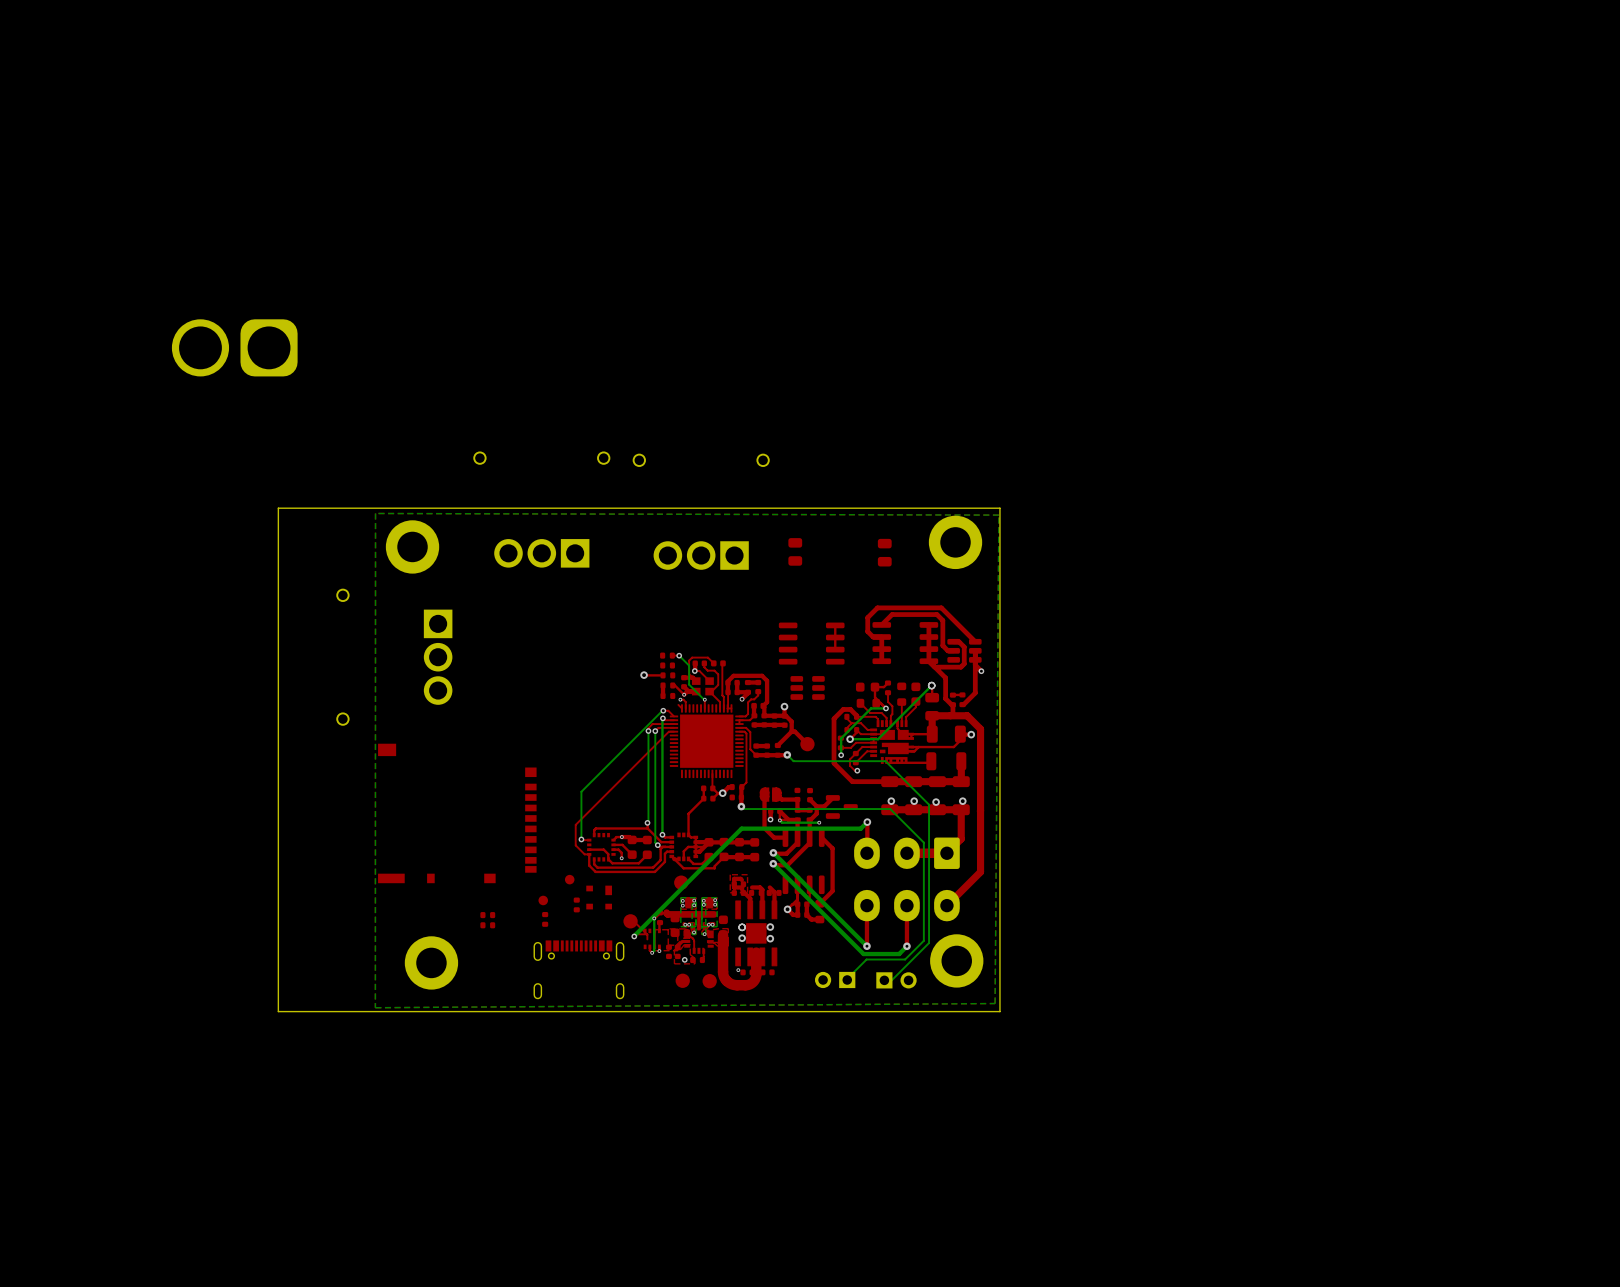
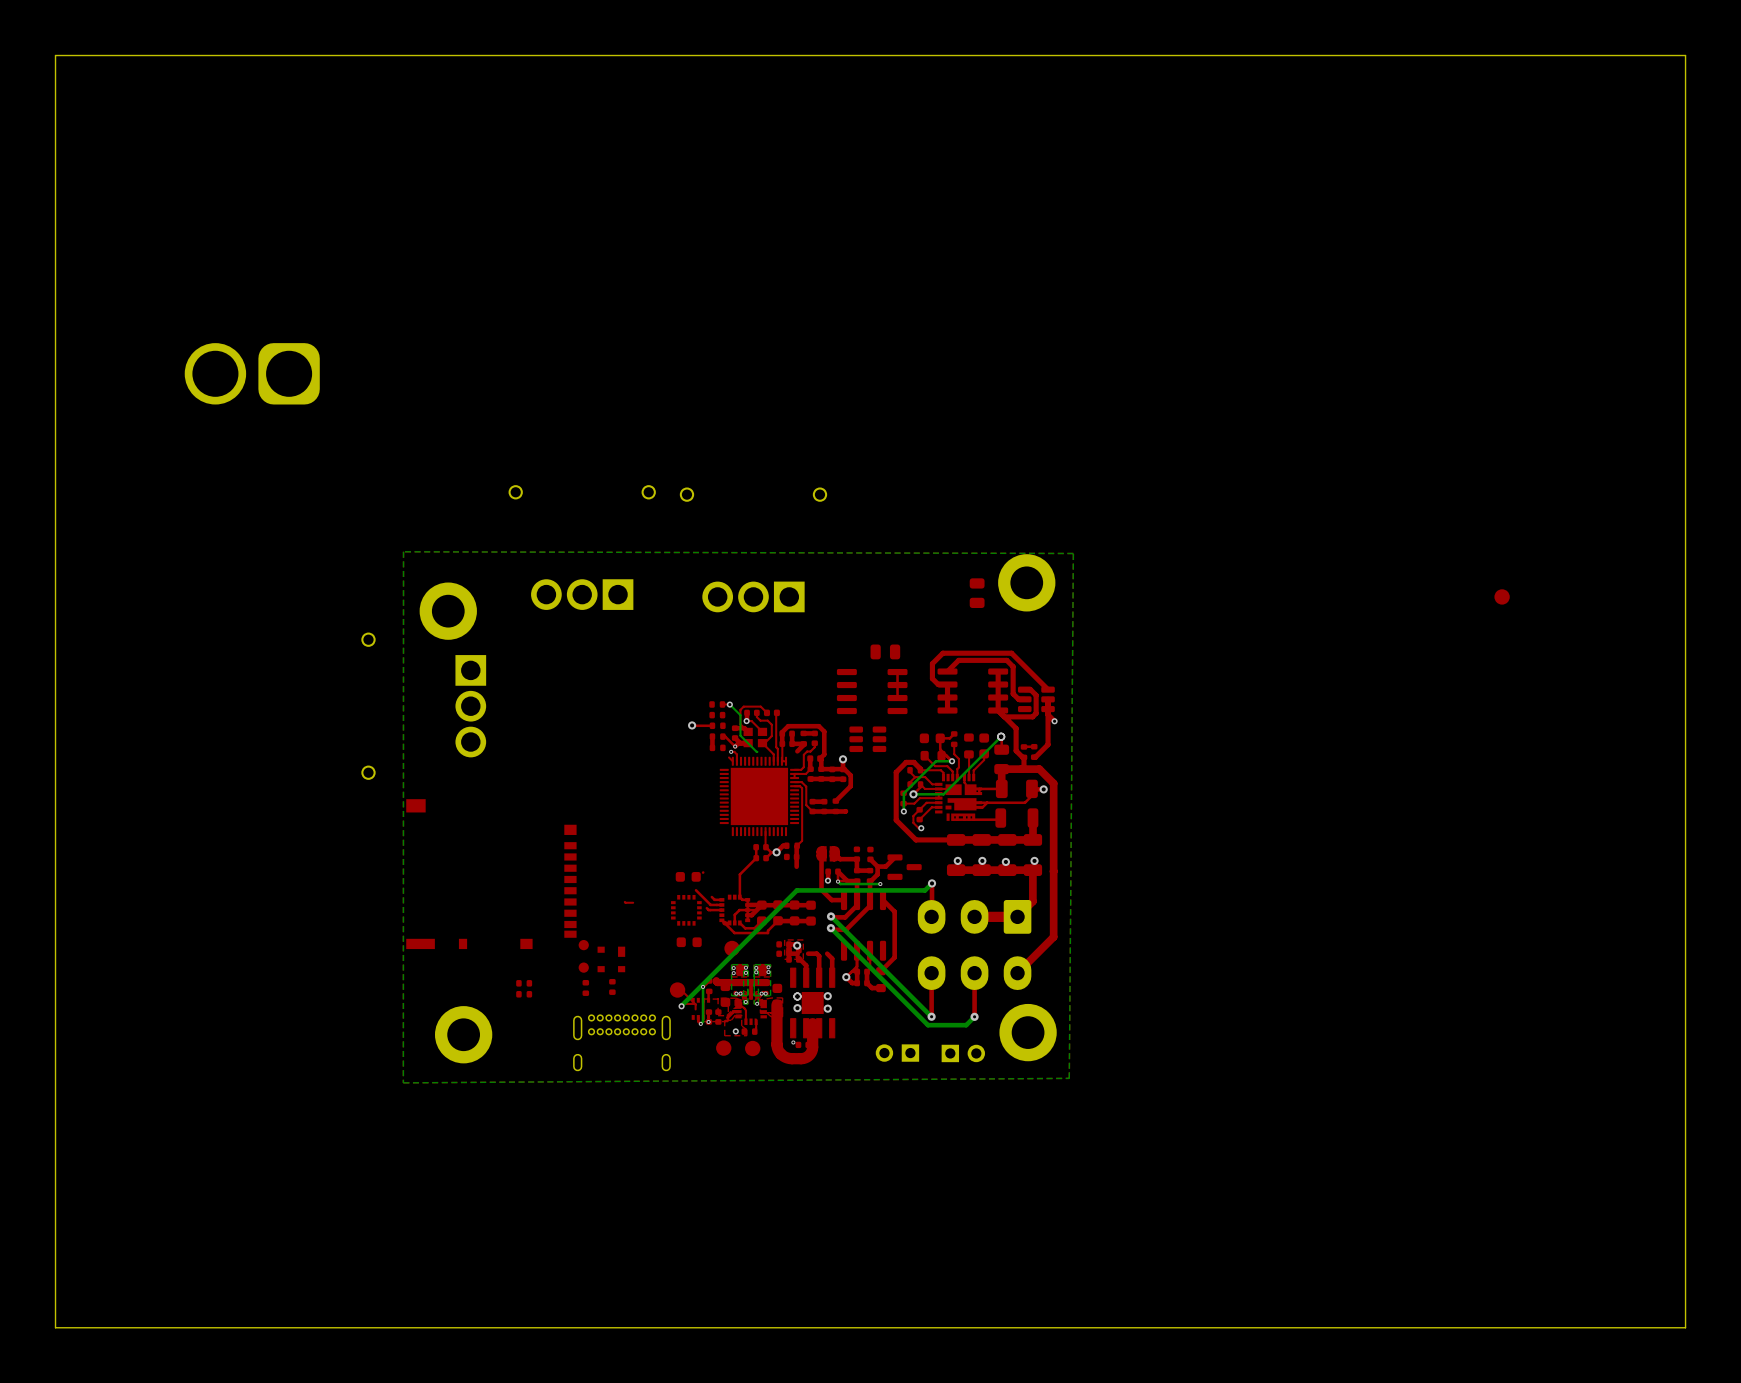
board edge: none -> (1685, 55) (1685, 1327) (55, 1327) (55, 55) (1685, 55)
board edge: (999, 508) (999, 1011) (278, 1011) (278, 508) (999, 508) -> none
part position: (412, 546) -> (448, 611)
part: (795, 551) -> none
part position: (884, 552) -> (977, 593)
part: none -> (1502, 596)
part: none -> (885, 651)
top track: (704, 699) (704, 708) -> none
via: (704, 699) -> none
via: (742, 699) -> none
top track: (663, 710) (668, 710) (673, 716) -> none
bottom track: (663, 710) (581, 791) (581, 839) -> none
via: (663, 710) -> none
top track: (662, 718) (664, 720) (673, 720) -> none
bottom track: (662, 718) (662, 834) -> none
via: (662, 718) -> none
top track: (673, 724) (652, 724) (648, 731) -> none
top track: (673, 727) (658, 727) (655, 731) -> none
bottom track: (648, 731) (647, 822) -> none
via: (648, 731) -> none
bottom track: (655, 731) (655, 842) (657, 845) -> none
via: (655, 731) -> none
top track: (673, 731) (668, 731) (575, 824) (575, 845) (584, 854) (589, 854) (589, 865) (595, 871) (654, 871) (664, 861) (664, 853) (671, 851) -> none
top track: (791, 731) (794, 731) (807, 744) -> none
part: (807, 744) -> none
bottom track: (787, 754) (793, 761) (885, 761) (929, 804) (929, 943) (891, 980) (884, 980) -> none
via: (787, 754) -> none
bottom track: (741, 806) (743, 809) (890, 809) (923, 842) (923, 940) (905, 959) (866, 959) (847, 979) -> none
via: (741, 806) -> none
top track: none -> (703, 872) (703, 872)
part: none -> (688, 876)
top track: (647, 822) (647, 828) (595, 828) (594, 835) -> none
via: (647, 822) -> none
via: (662, 834) -> none
via: (621, 837) -> none
via: (581, 839) -> none
top track: (647, 840) (616, 837) (613, 840) -> none
top track: (613, 844) (622, 844) (632, 854) -> none
via: (657, 845) -> none
top track: (662, 846) (660, 849) (660, 860) (653, 867) (597, 867) (594, 864) (594, 859) -> none
part position: (601, 847) -> (686, 910)
part: (632, 847) -> none
part: (647, 847) -> none
top track: (589, 849) (603, 849) (608, 854) (608, 859) -> none
top track: (613, 849) (618, 849) (621, 852) (621, 858) -> none
top track: (647, 854) (638, 863) (612, 863) (608, 859) -> none
via: (621, 858) -> none
part: none -> (689, 942)
part: none -> (784, 944)
part position: (569, 879) -> (583, 945)
via: none -> (797, 945)
part: none -> (784, 953)
part: (756, 892) -> none
part: (774, 892) -> none
part position: (599, 897) -> (611, 959)
part position: (576, 904) -> (612, 986)
part footprint: [533, 940, 625, 1000] -> [573, 1014, 671, 1072]
part: none -> (708, 1017)
part: none -> (718, 1017)
part: (668, 951) -> none
part: (677, 951) -> none
part: (767, 972) -> none
part: none -> (723, 1048)
part: none -> (752, 1048)
part: (682, 980) -> none
part: (709, 981) -> none

